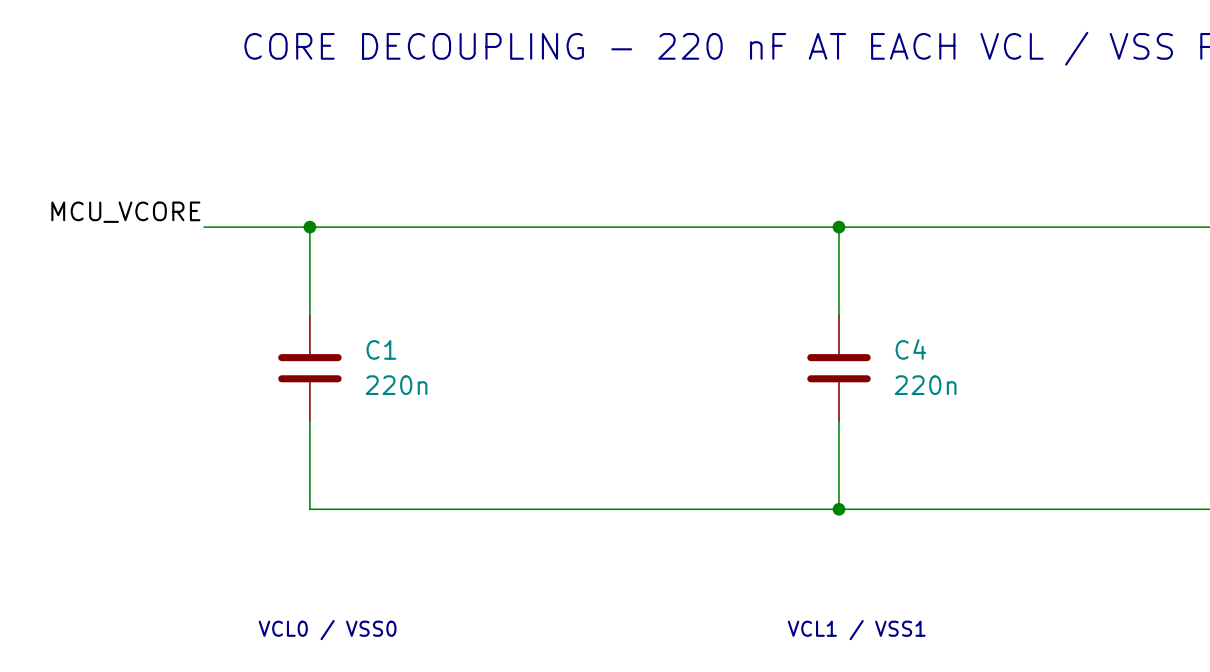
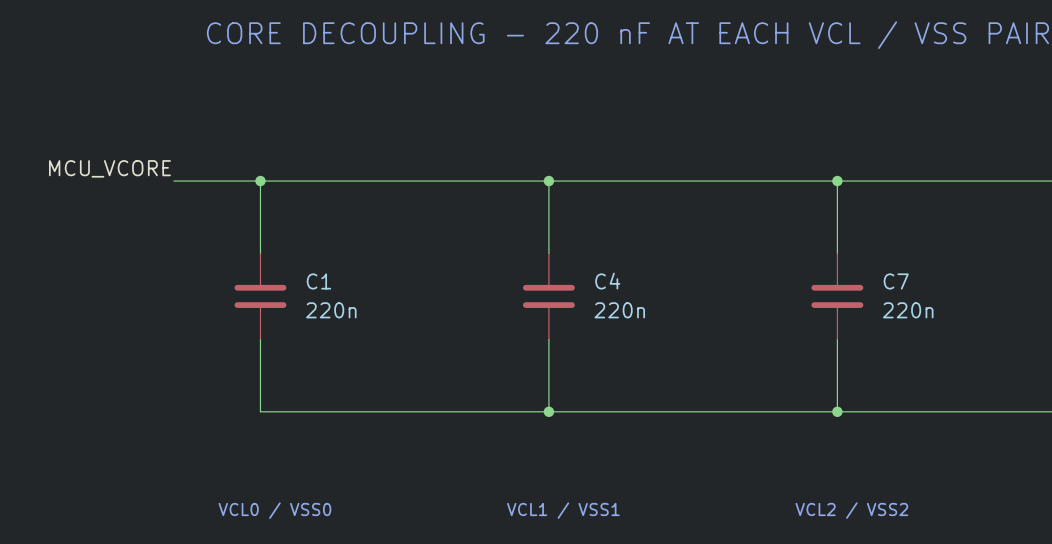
junction: none -> (548, 181)
wire: (838, 227) (838, 315) -> (548, 181) (548, 253)
junction: (838, 227) -> none
wire: none -> (837, 181) (837, 253)
junction: none -> (837, 181)
C4 position: (838, 368) -> (548, 296)
C7: none -> 220n (837, 296)
wire: (838, 421) (838, 509) -> (548, 339) (548, 411)
wire: none -> (837, 339) (837, 411)
junction: none -> (548, 411)
junction: (838, 509) -> none
junction: none -> (837, 411)
text position: VCL1 / VSS1 (856, 630) -> VCL1 / VSS1 (563, 510)
text: none -> VCL2 / VSS2 (851, 510)

